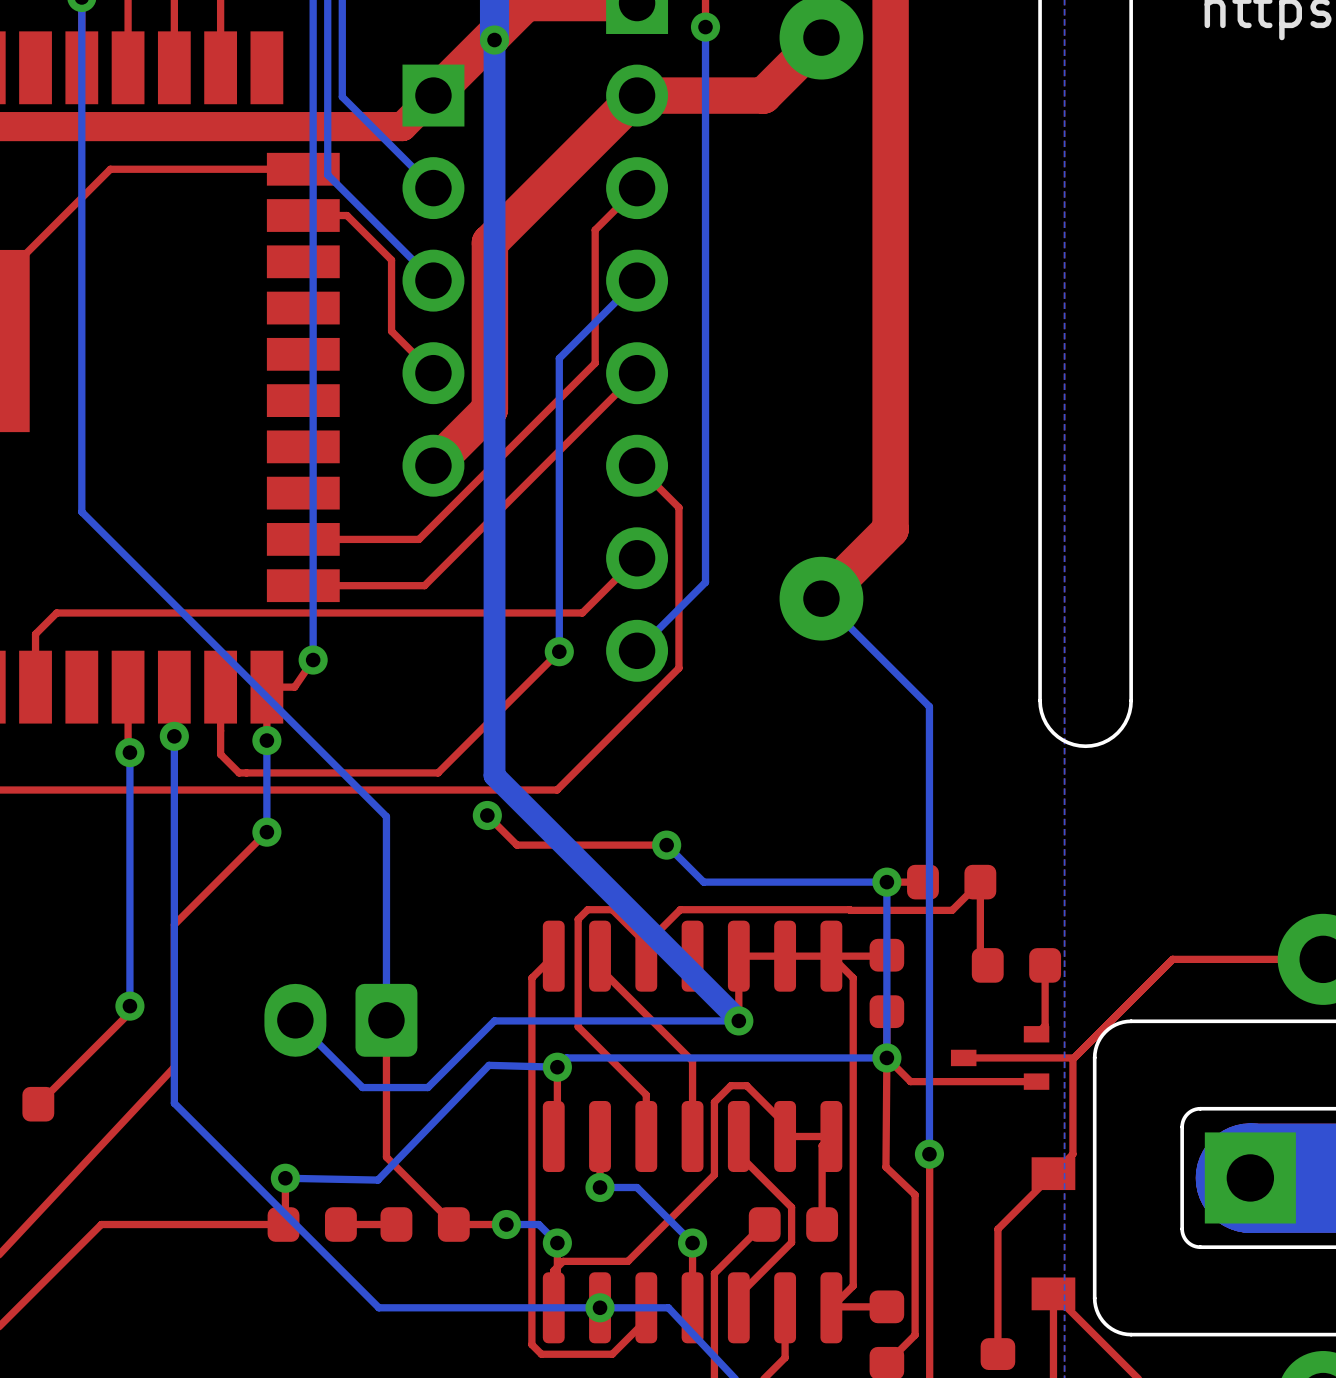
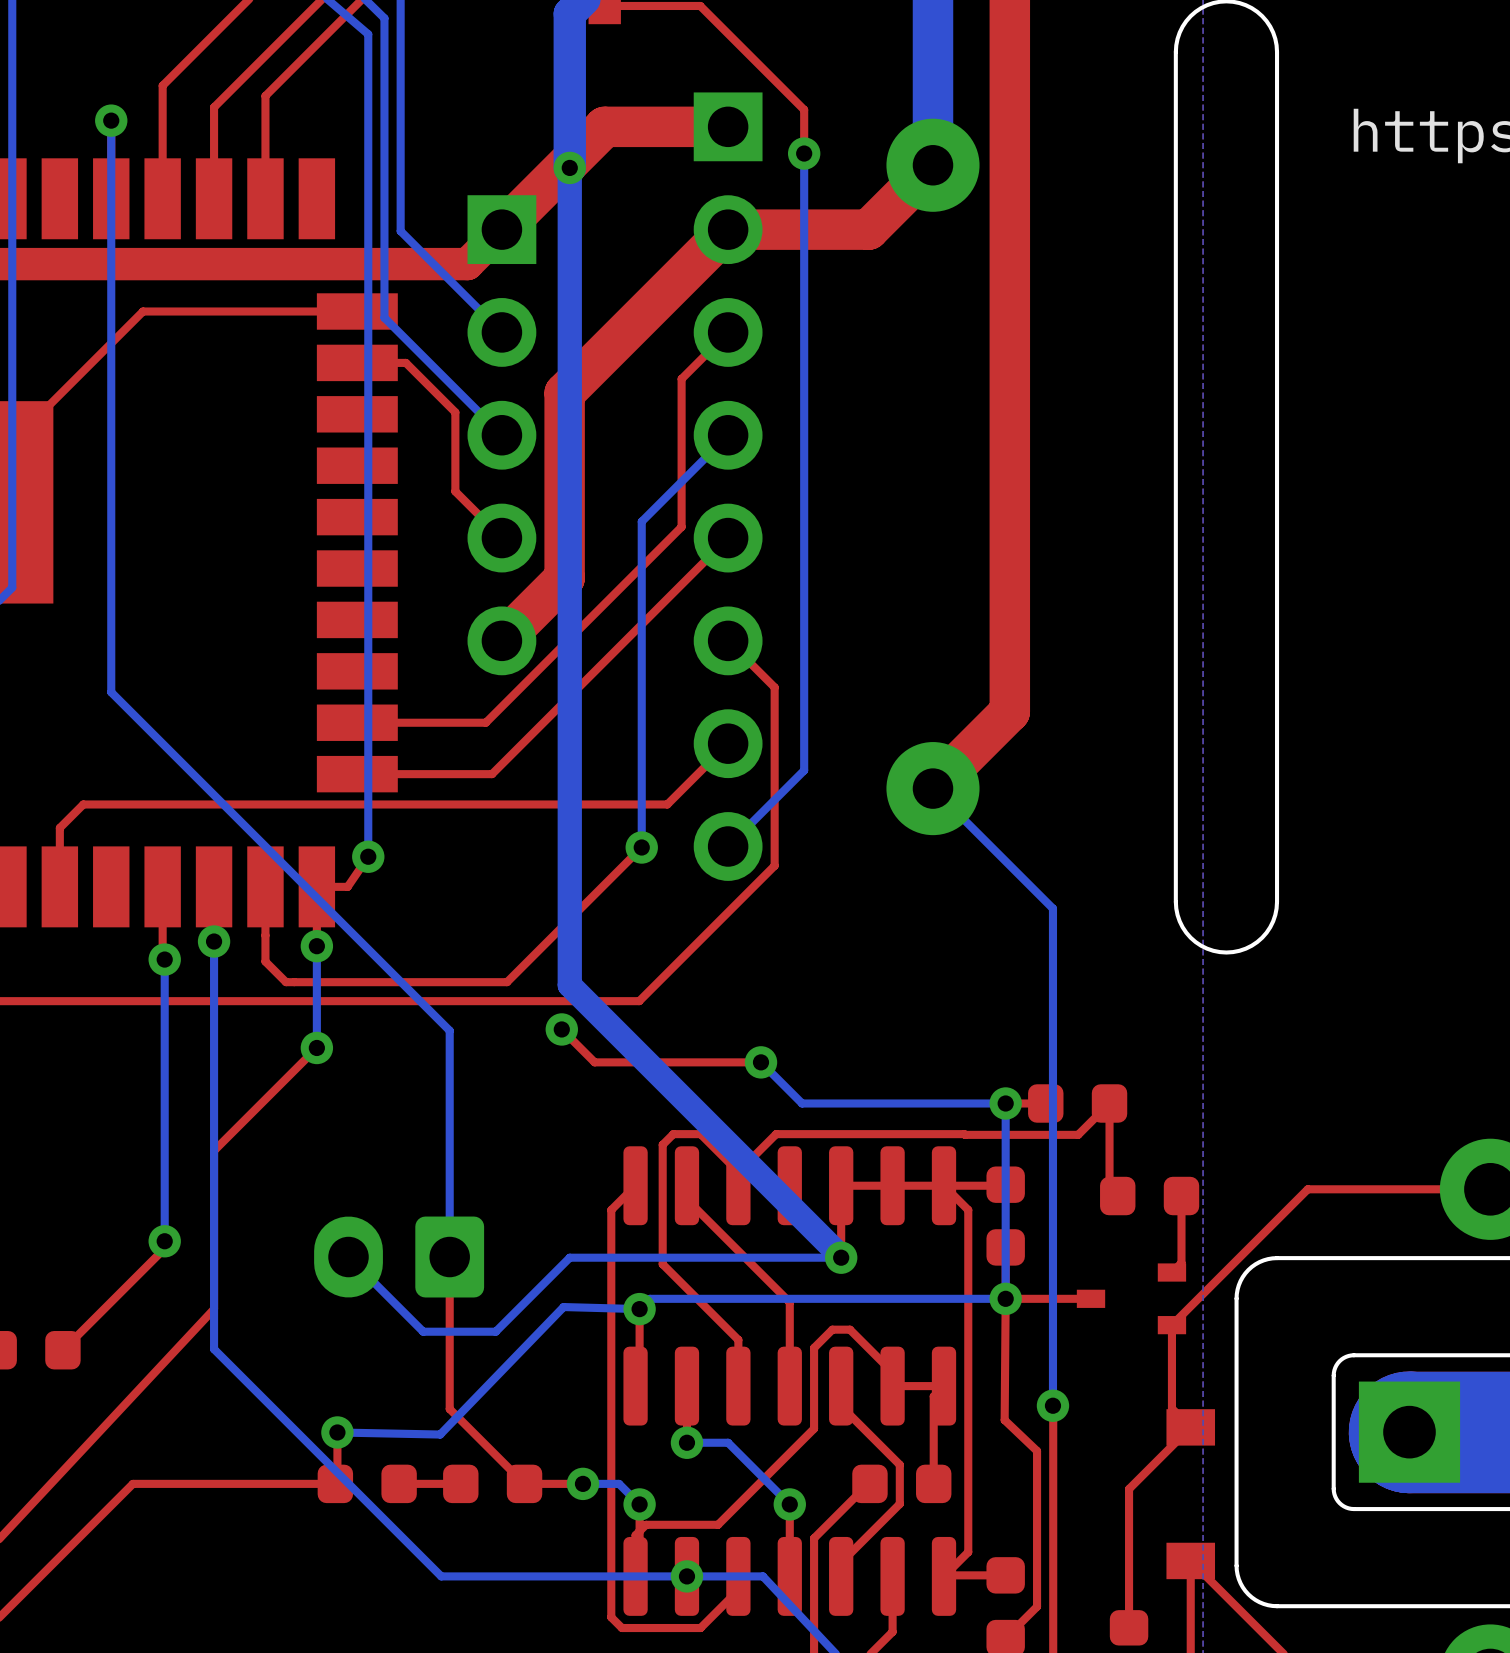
top track: (1172, 959) (1072, 1059) (1072, 1154) (1053, 1173) -> (1323, 1189) (1307, 1189) (1171, 1325) (1171, 1408) (1190, 1427)
top track: (886, 1057) (910, 1081) (1036, 1081) -> (1005, 1298) (1091, 1298)
top track: (1074, 1057) (963, 1057) -> none

